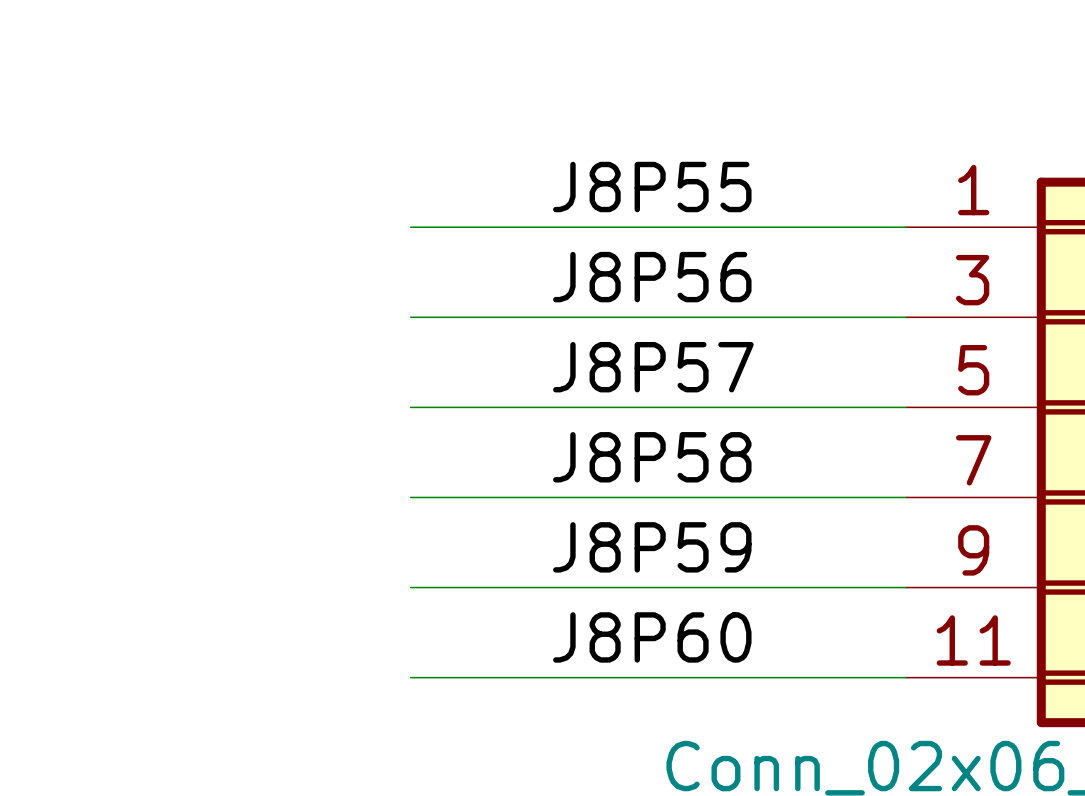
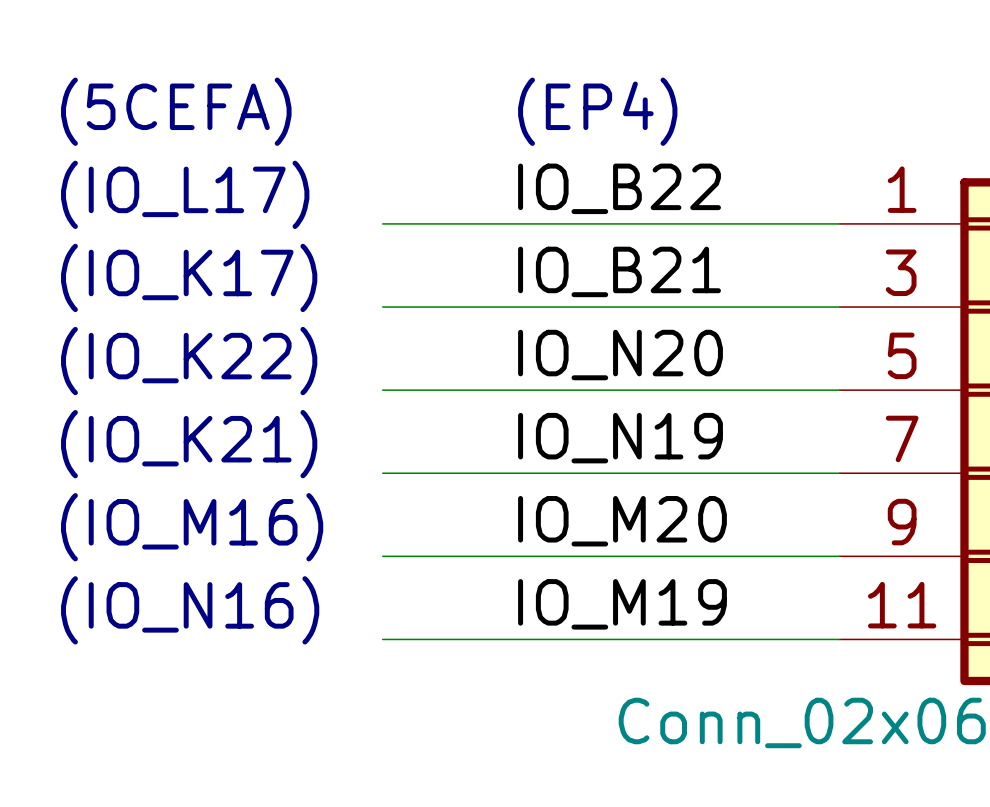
text: none -> (5CEFA) (176, 111)
text: none -> (EP4) (597, 111)
label: J8P55 (652, 187) -> IO_B22 (619, 188)
text: none -> (IO_L17) (185, 194)
label: J8P56 (652, 277) -> IO_B21 (619, 271)
text: none -> (IO_K17) (189, 277)
label: J8P57 (653, 367) -> IO_N20 (620, 355)
text: none -> (IO_K22) (189, 361)
label: J8P58 (652, 457) -> IO_N19 (620, 438)
text: none -> (IO_K21) (189, 444)
label: J8P59 (652, 547) -> IO_M20 (622, 521)
text: none -> (IO_M16) (192, 527)
label: J8P60 (652, 637) -> IO_M19 (622, 604)
text: none -> (IO_N16) (190, 610)

